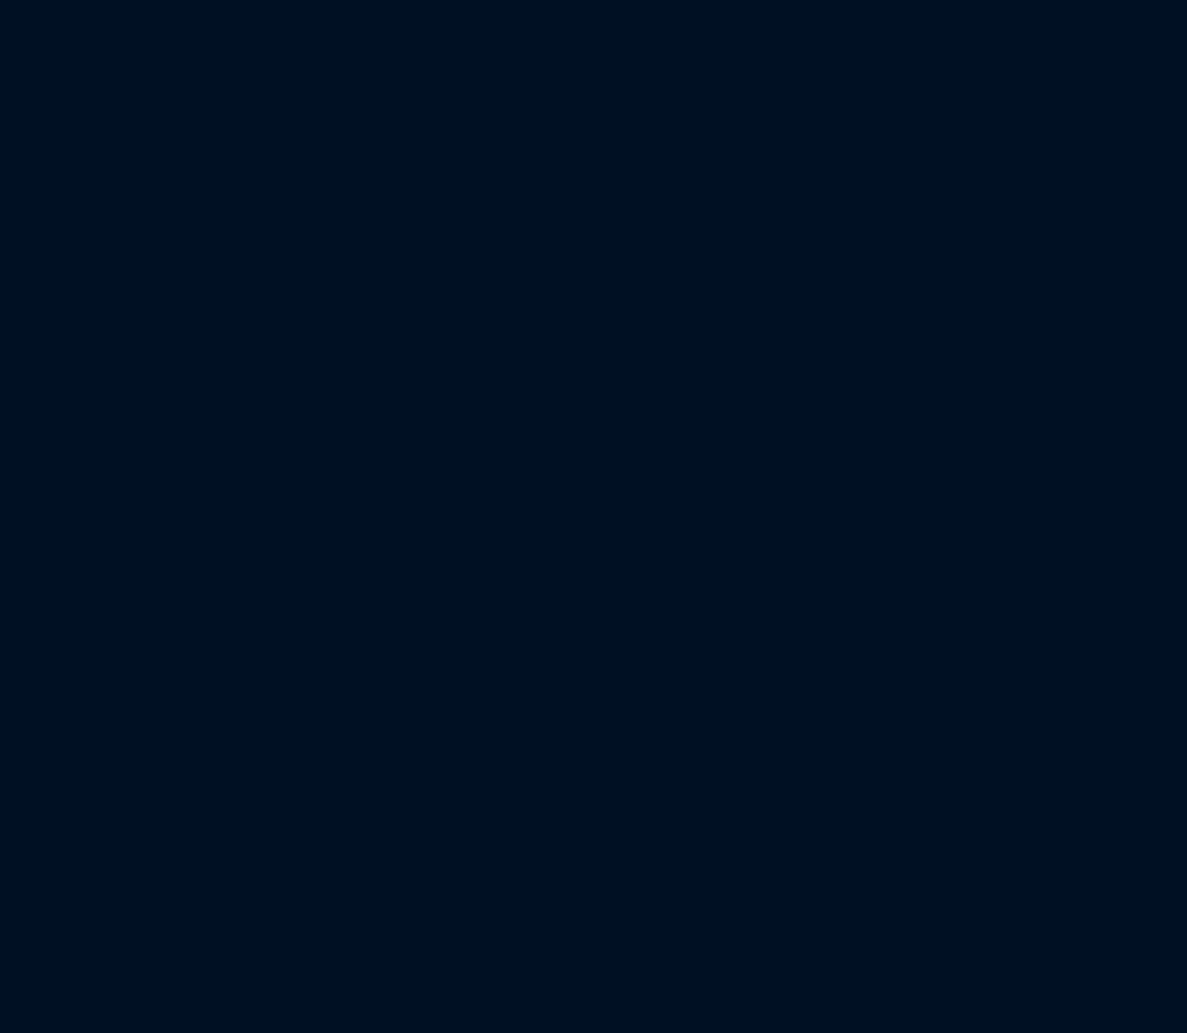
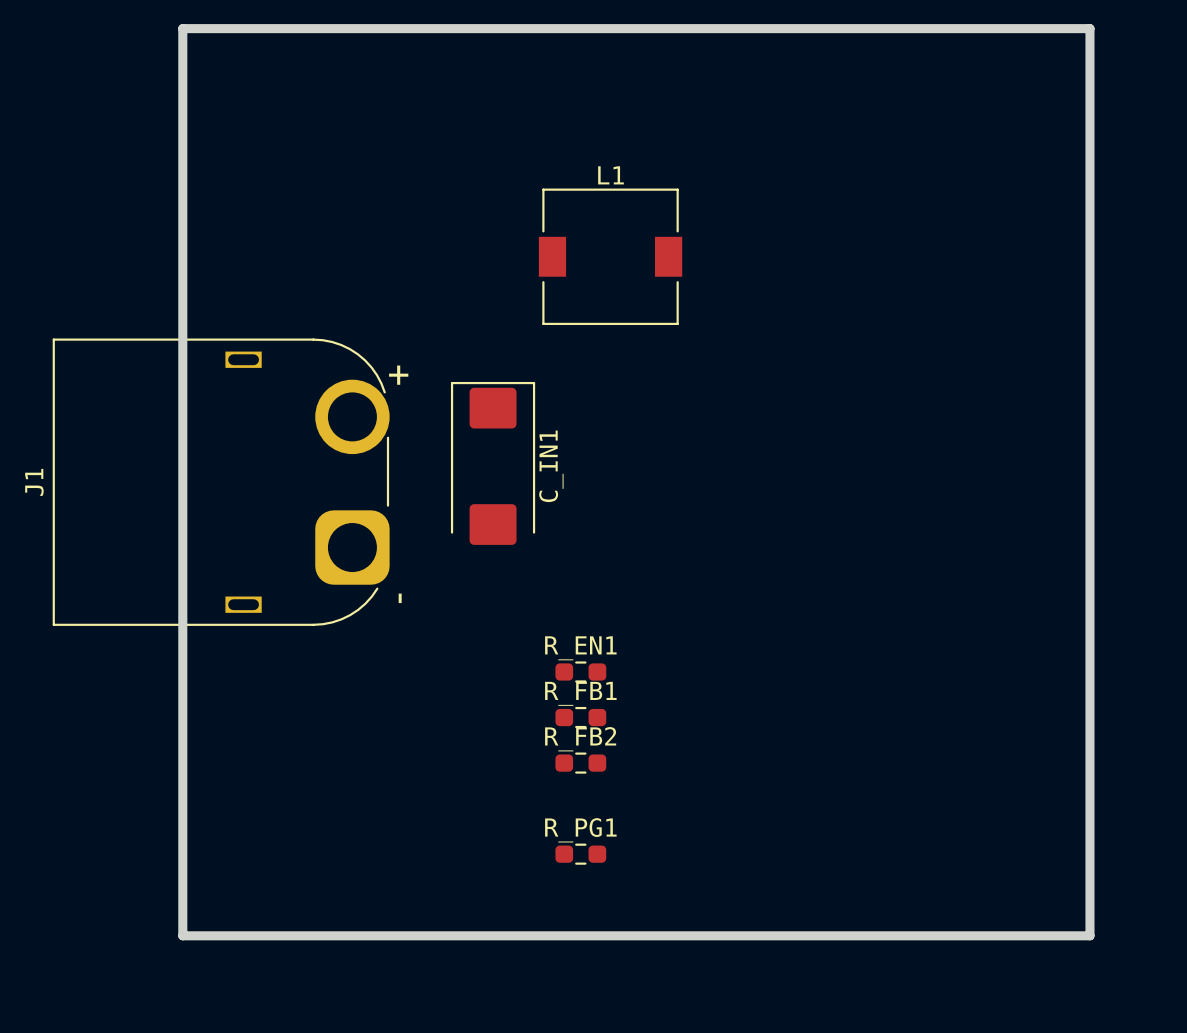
board edge: none -> (182, 28) (1089, 28) (1089, 935) (182, 935) (182, 28)
L1: none -> (610, 256)
C_IN1: none -> (493, 463)
J1: none -> (221, 482)
R_EN1: none -> (580, 672)
R_FB1: none -> (580, 717)
R_FB2: none -> (580, 763)
R_PG1: none -> (580, 854)

